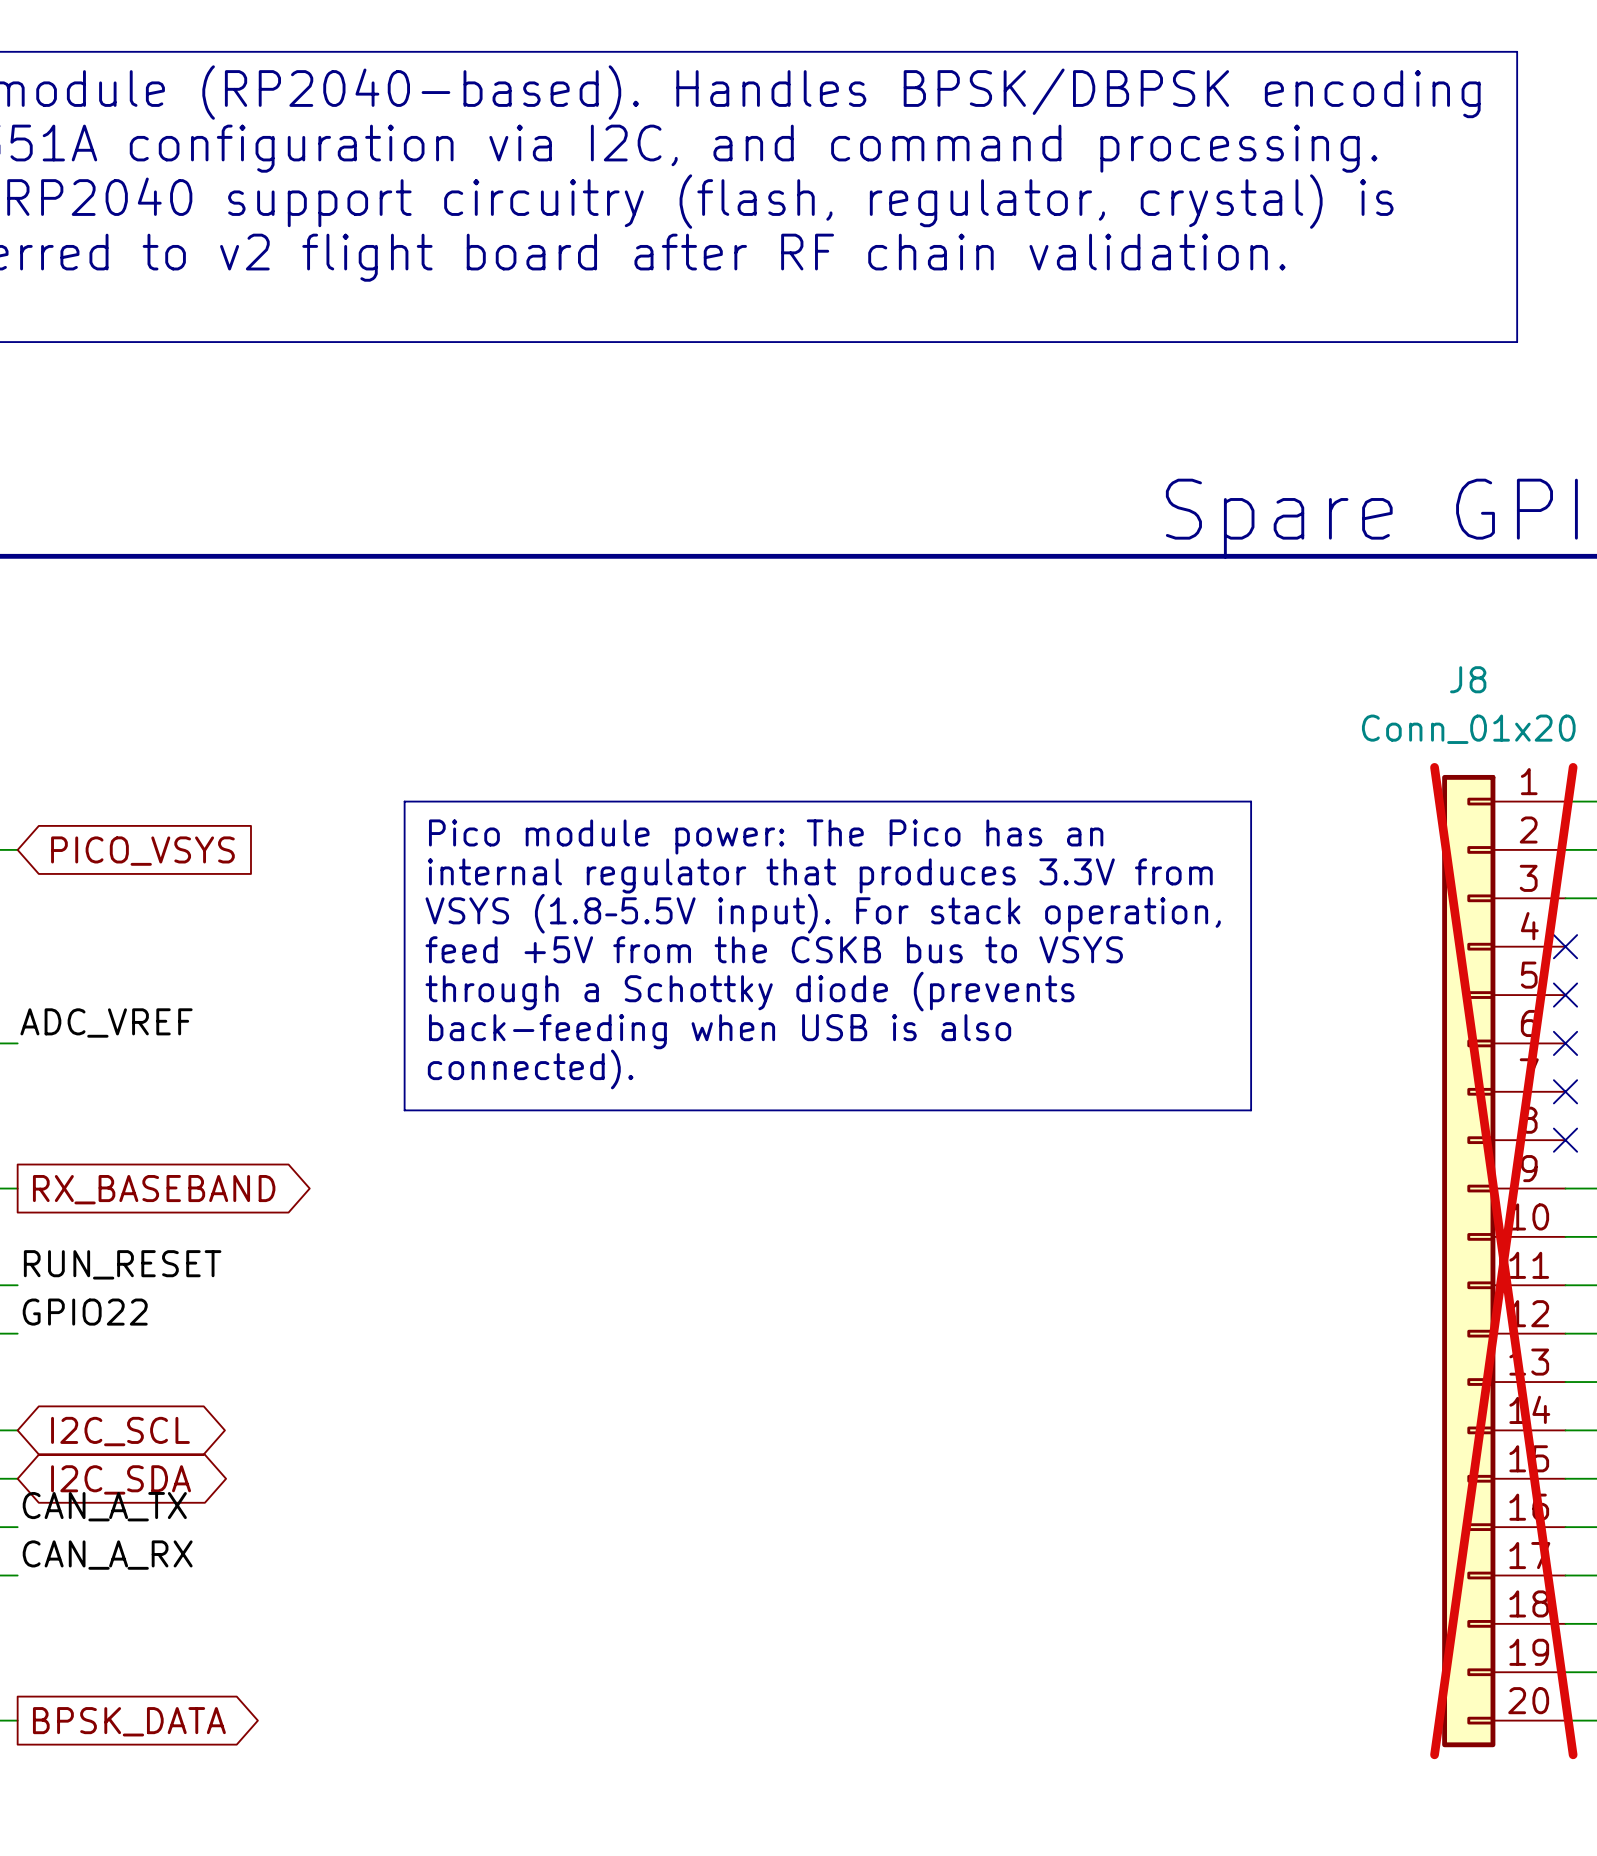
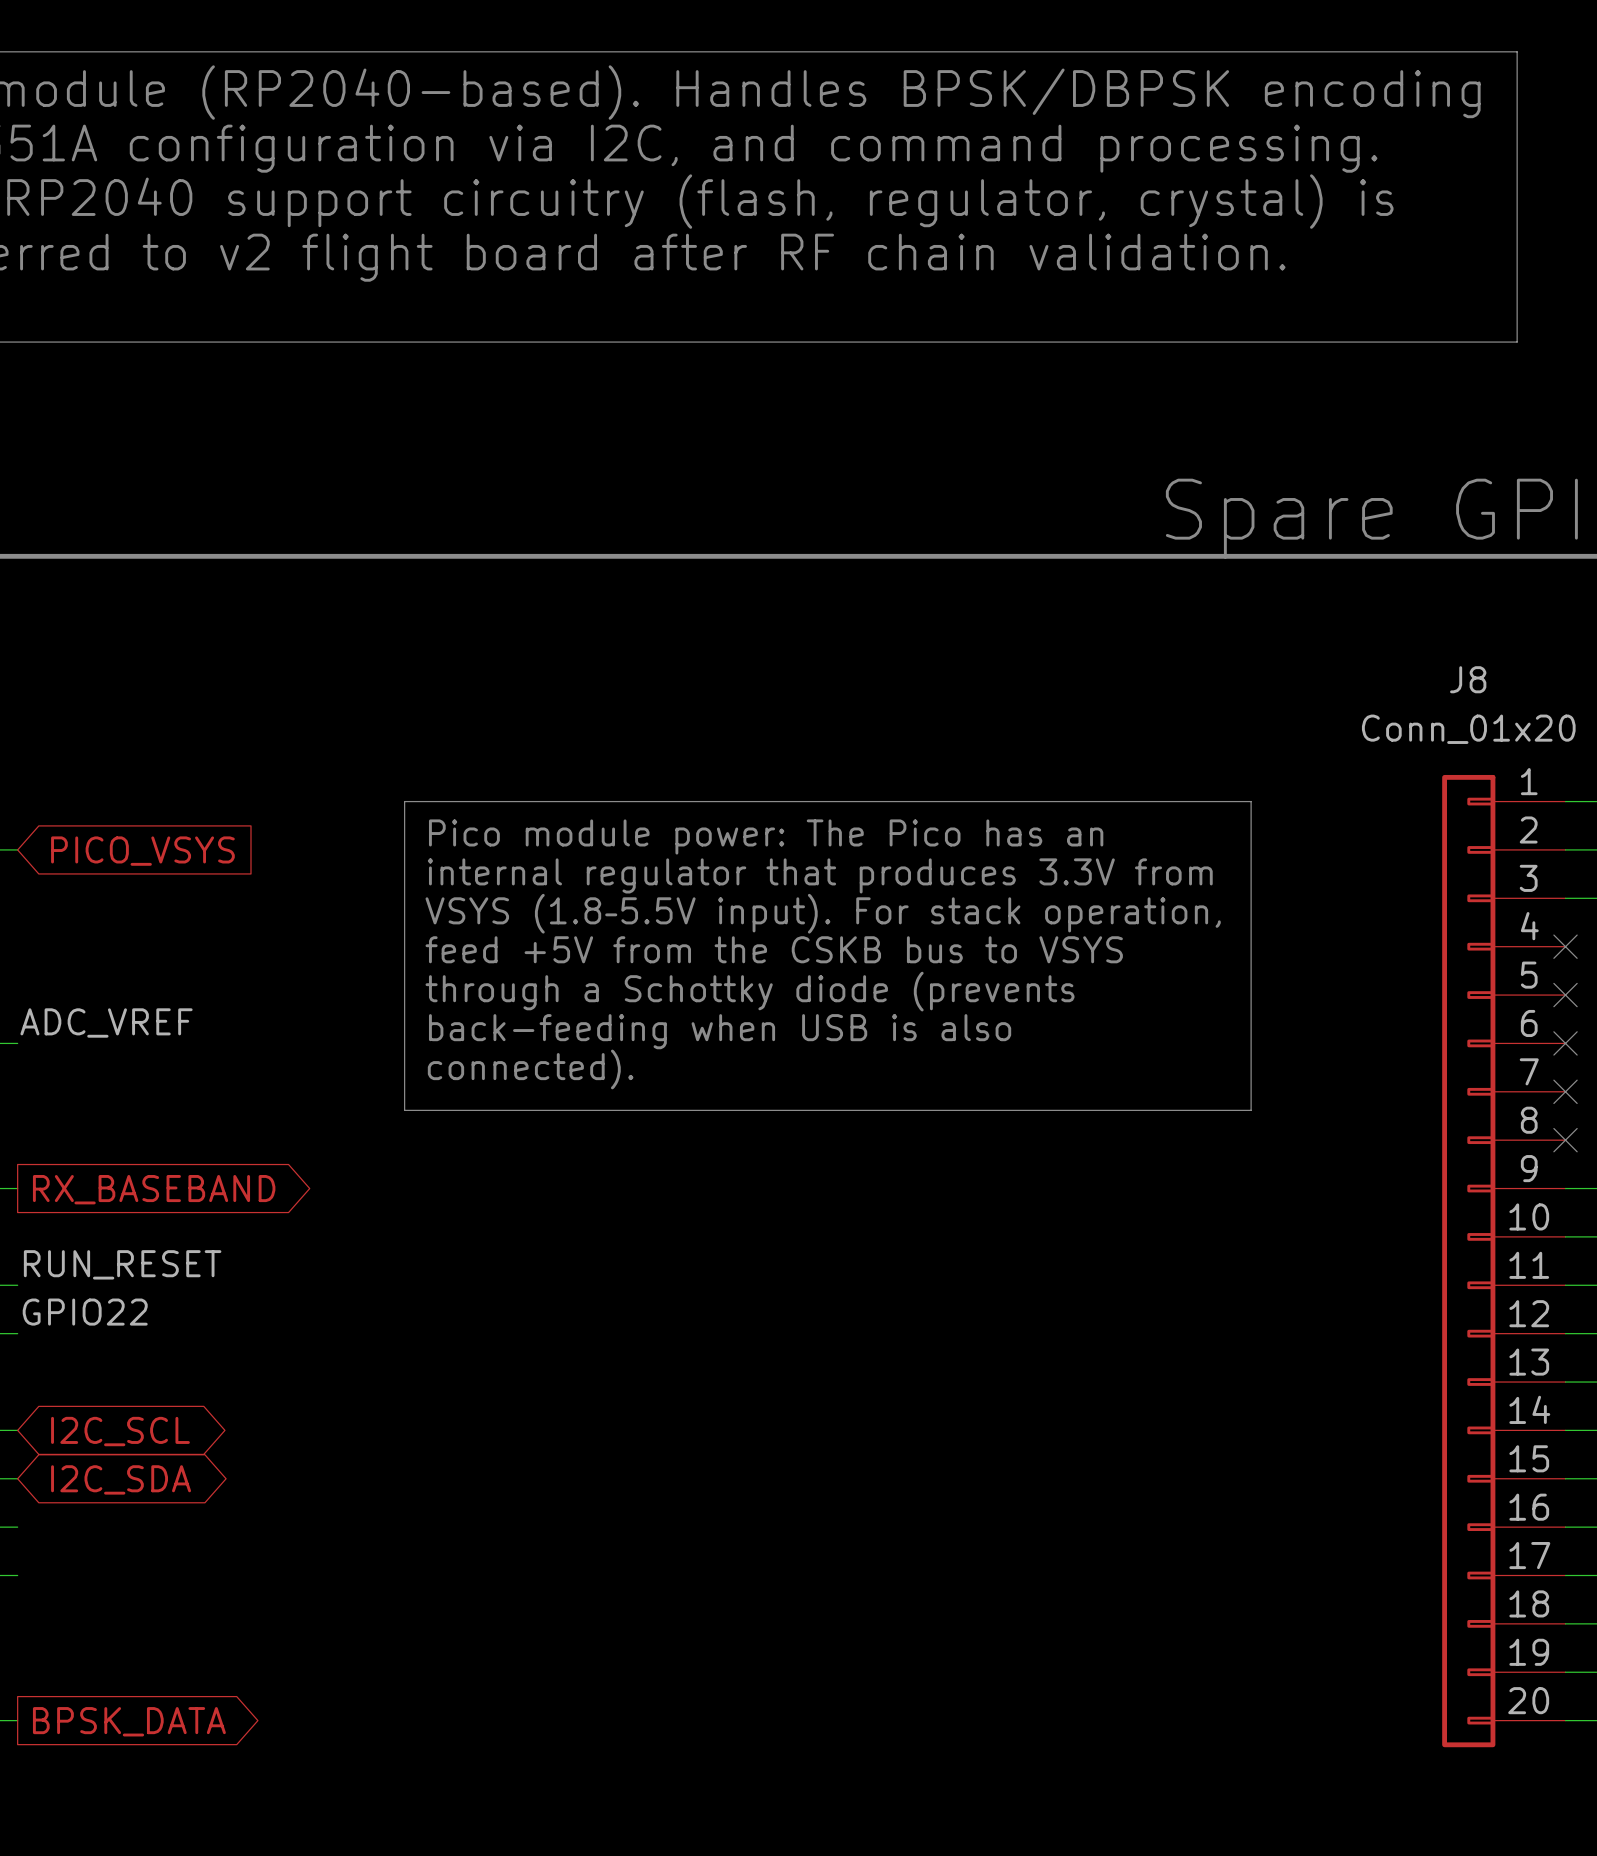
J8 do-not-place cross: (1503, 1261) -> none
label: CAN_A_TX (104, 1506) -> none
label: CAN_A_RX (107, 1555) -> none

